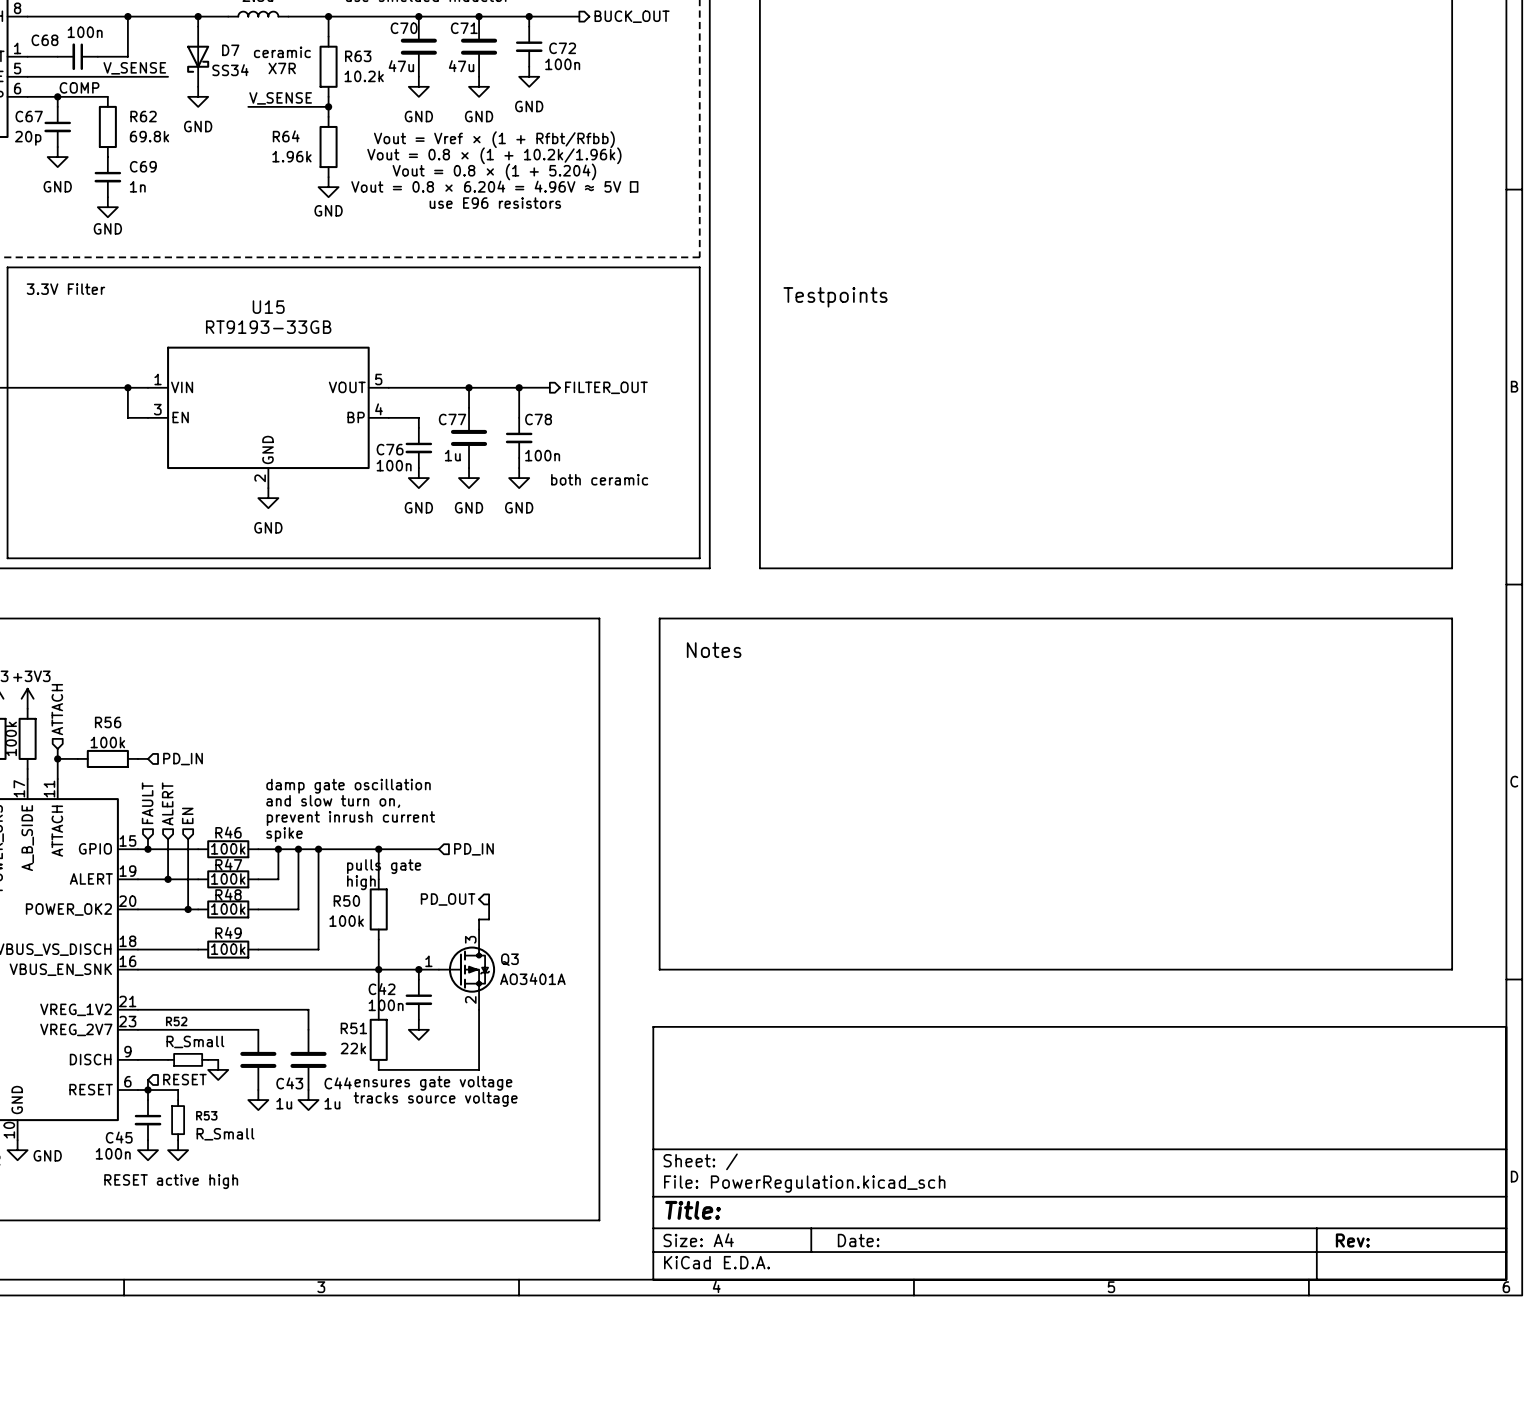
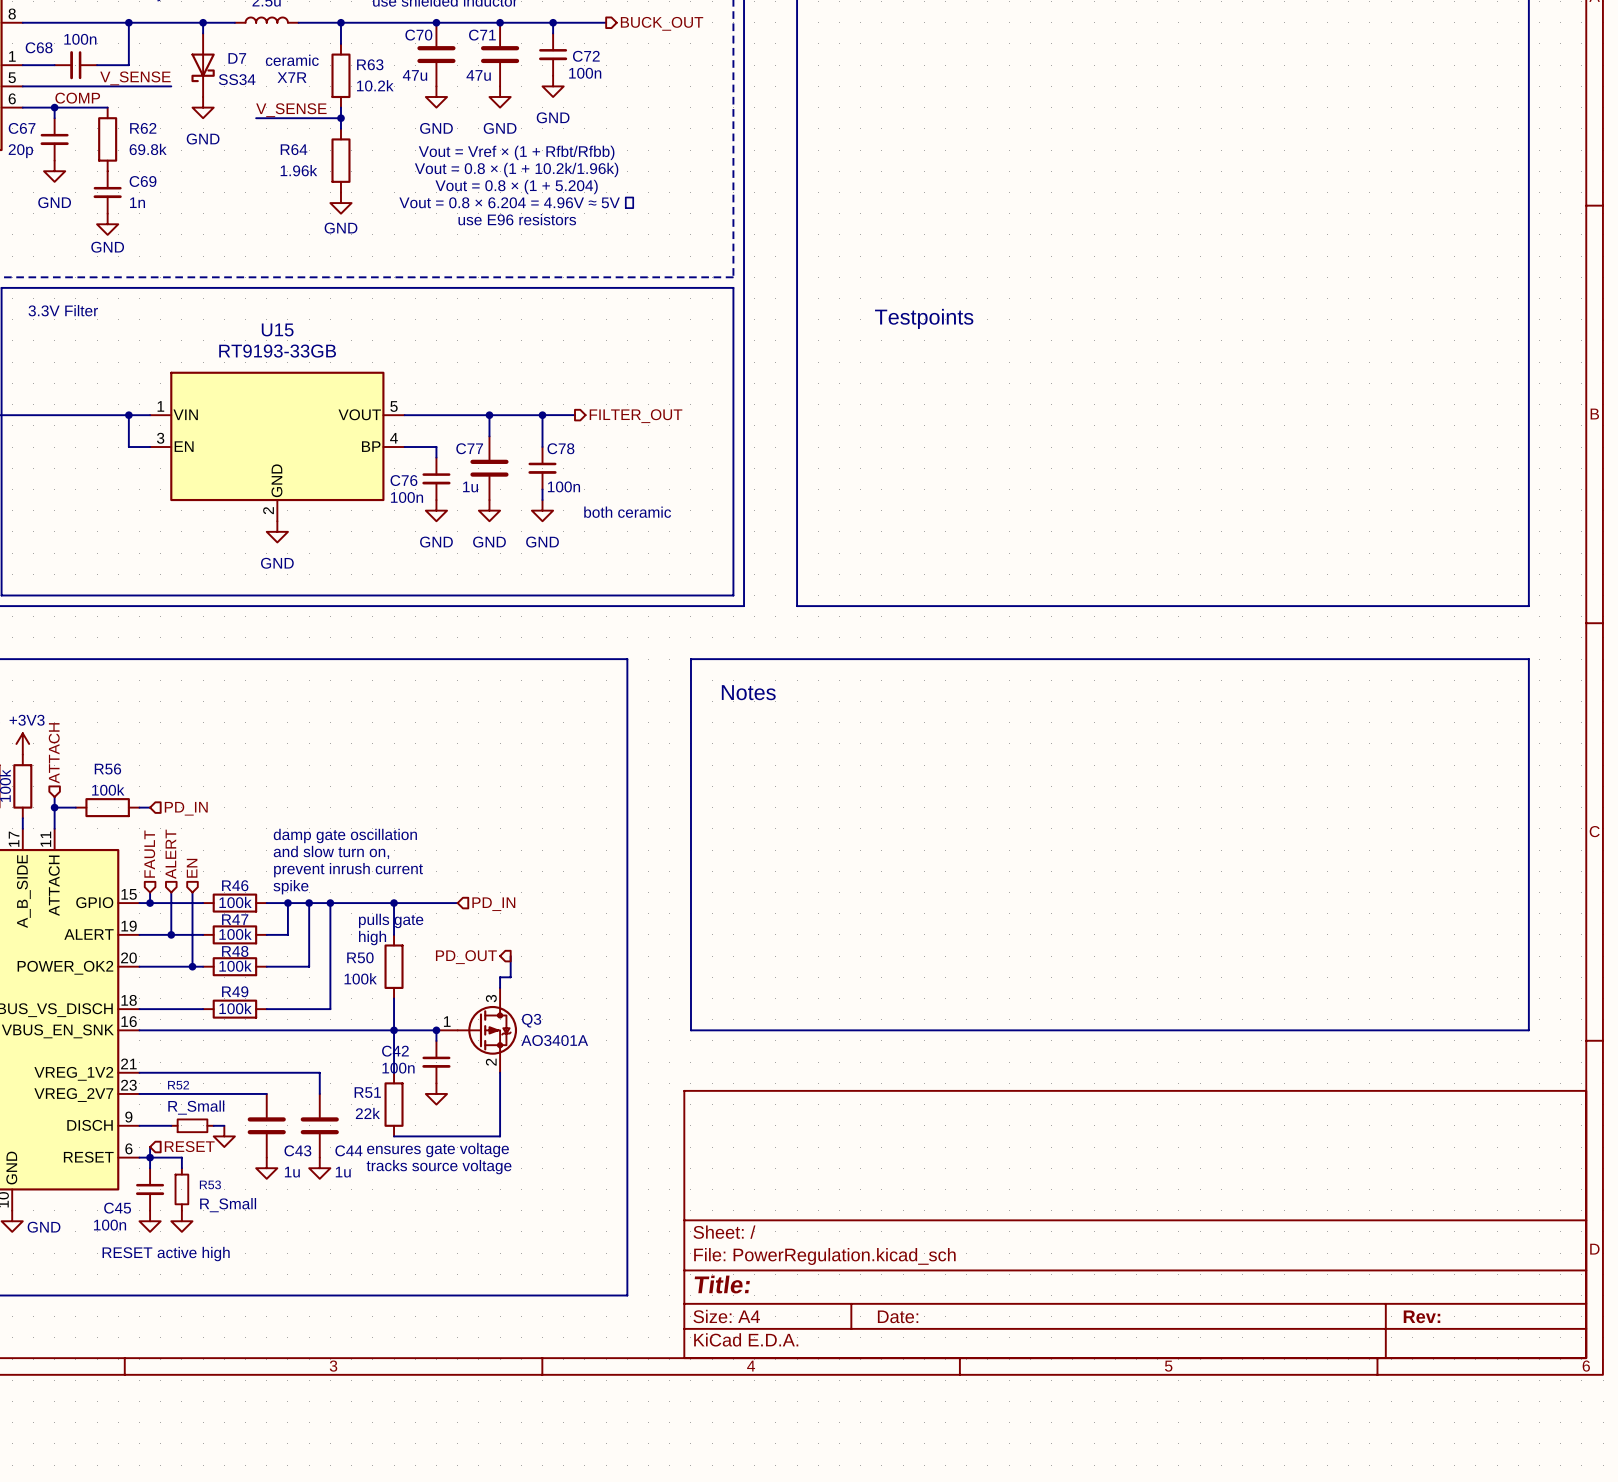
text position: Testpoints (835, 297) -> Testpoints (924, 318)

